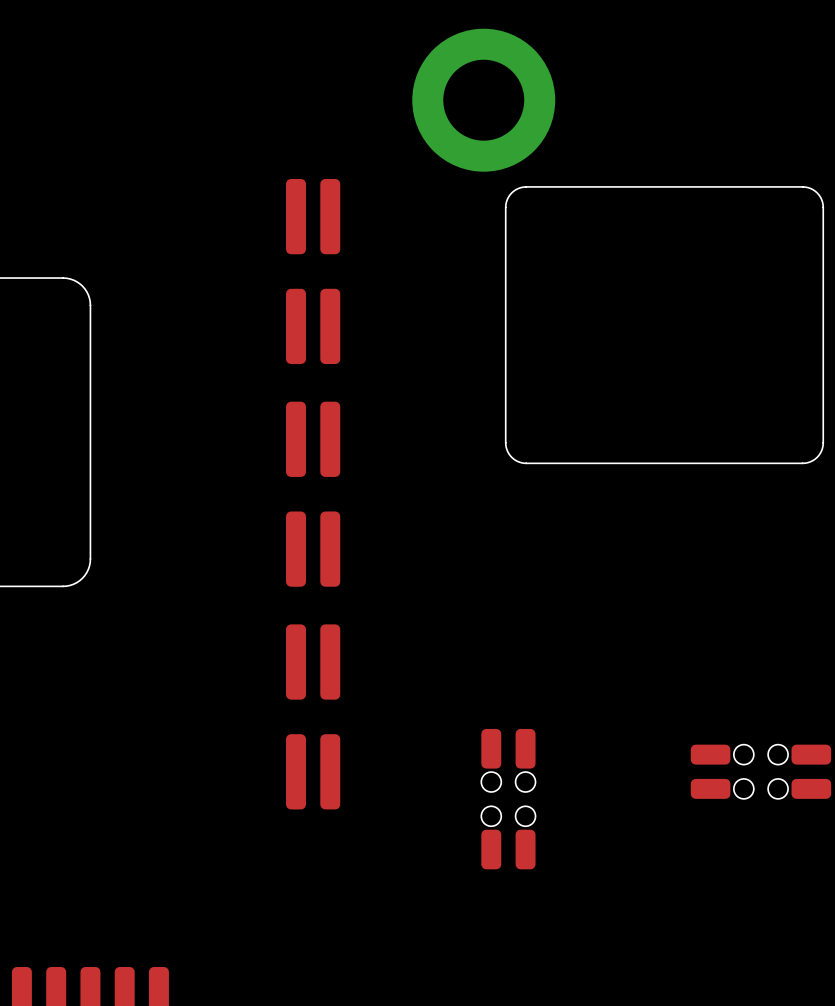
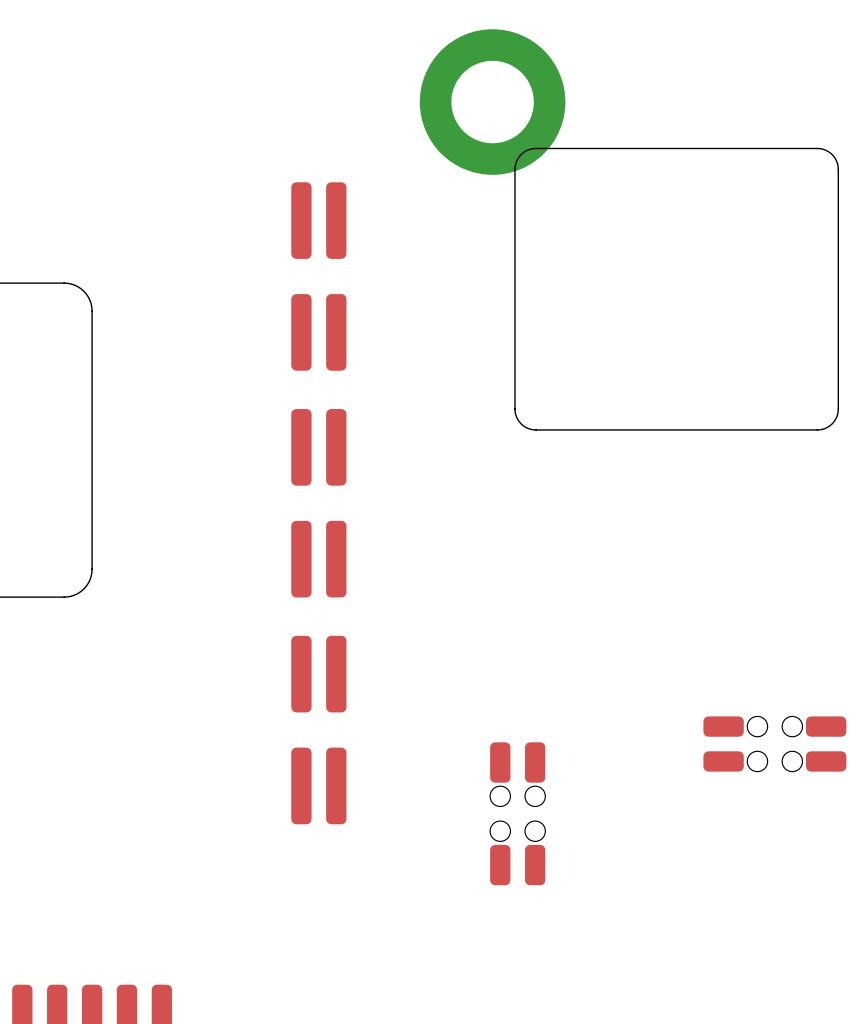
drawing position: (664, 325) -> (676, 289)
part position: (760, 771) -> (774, 744)

